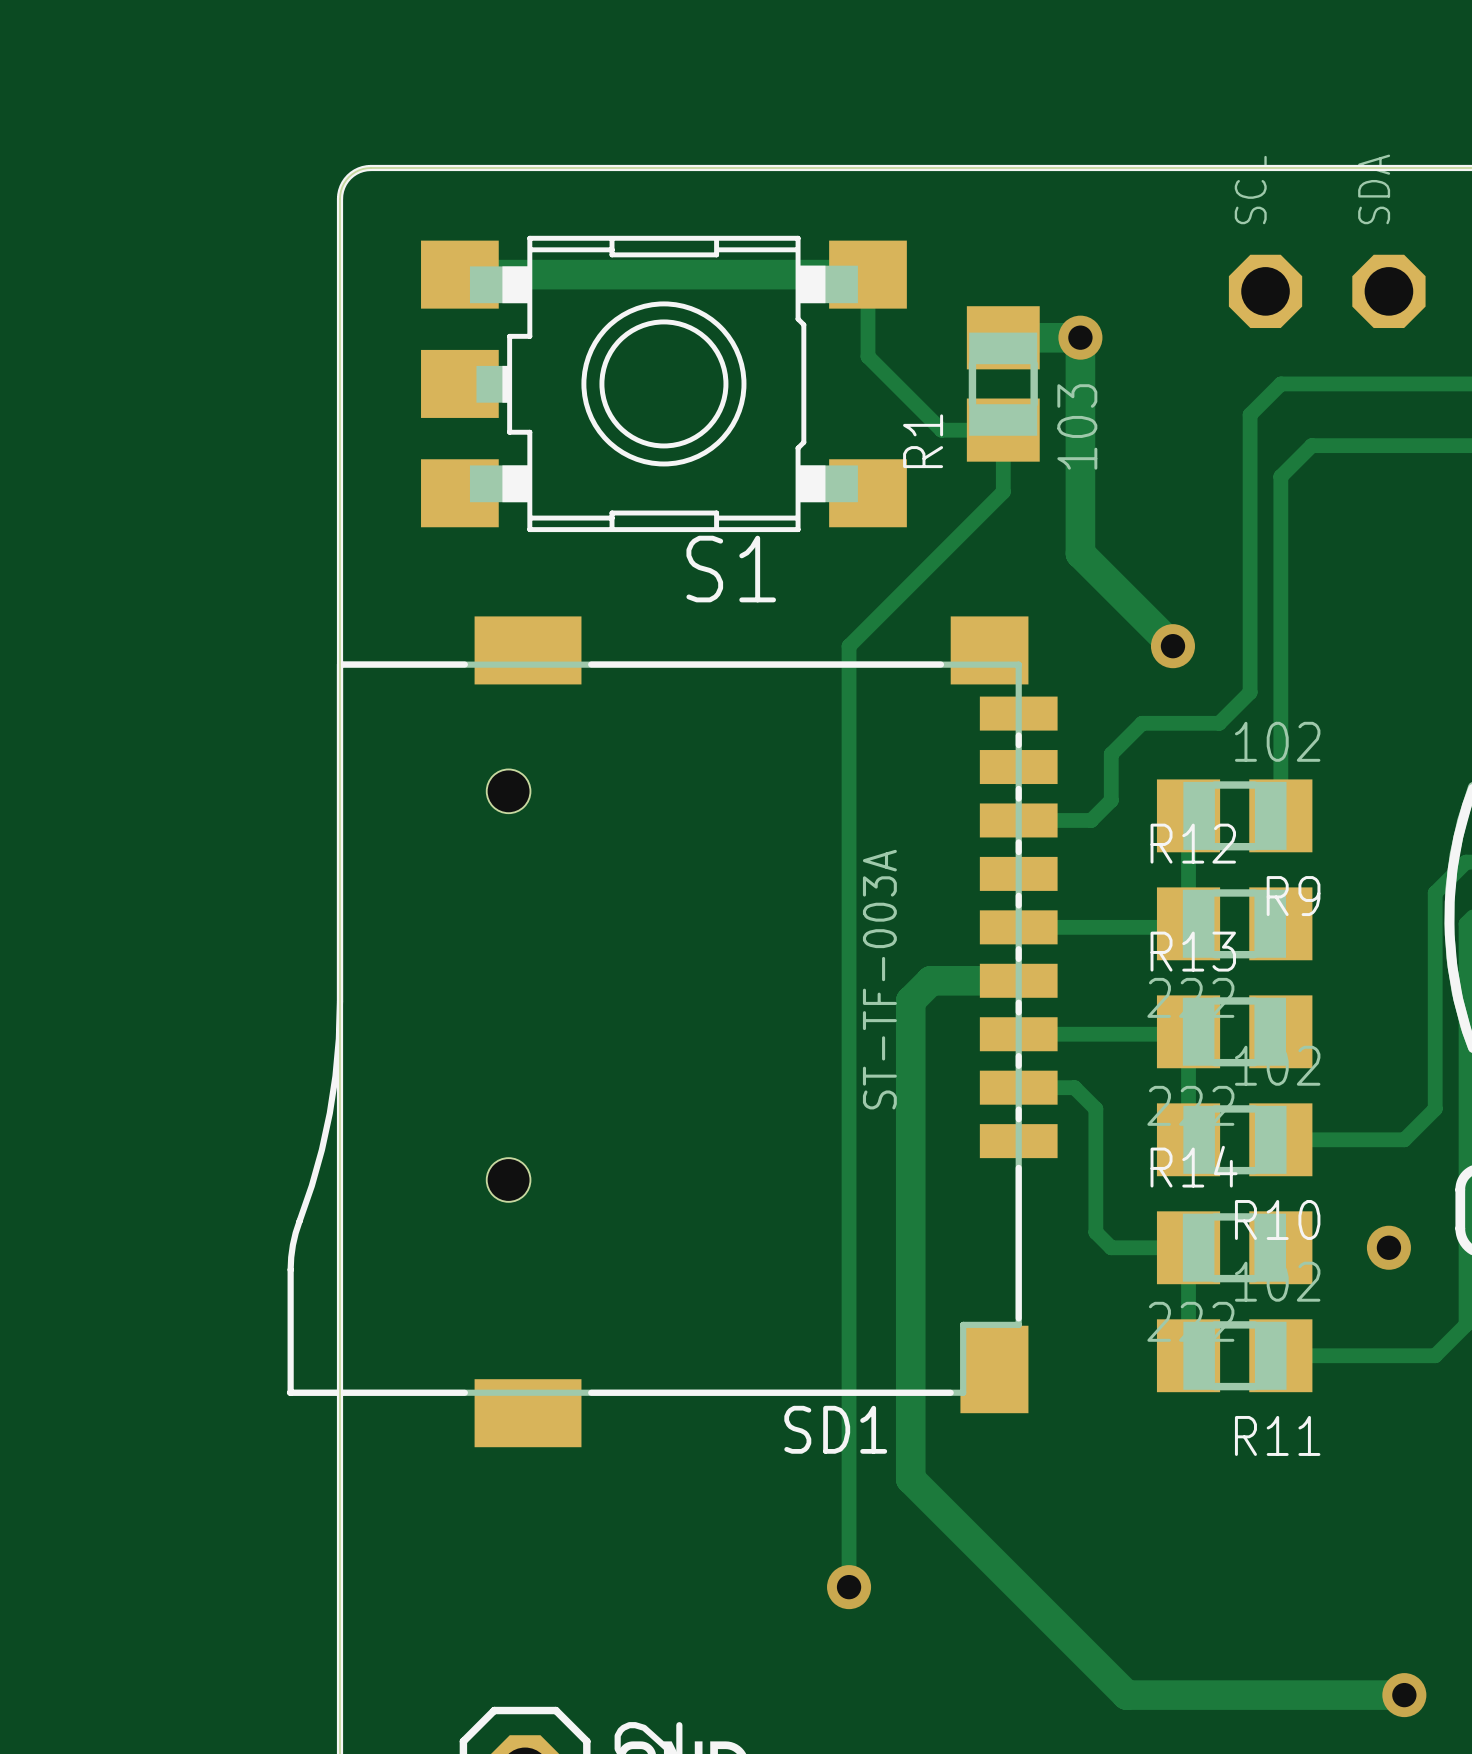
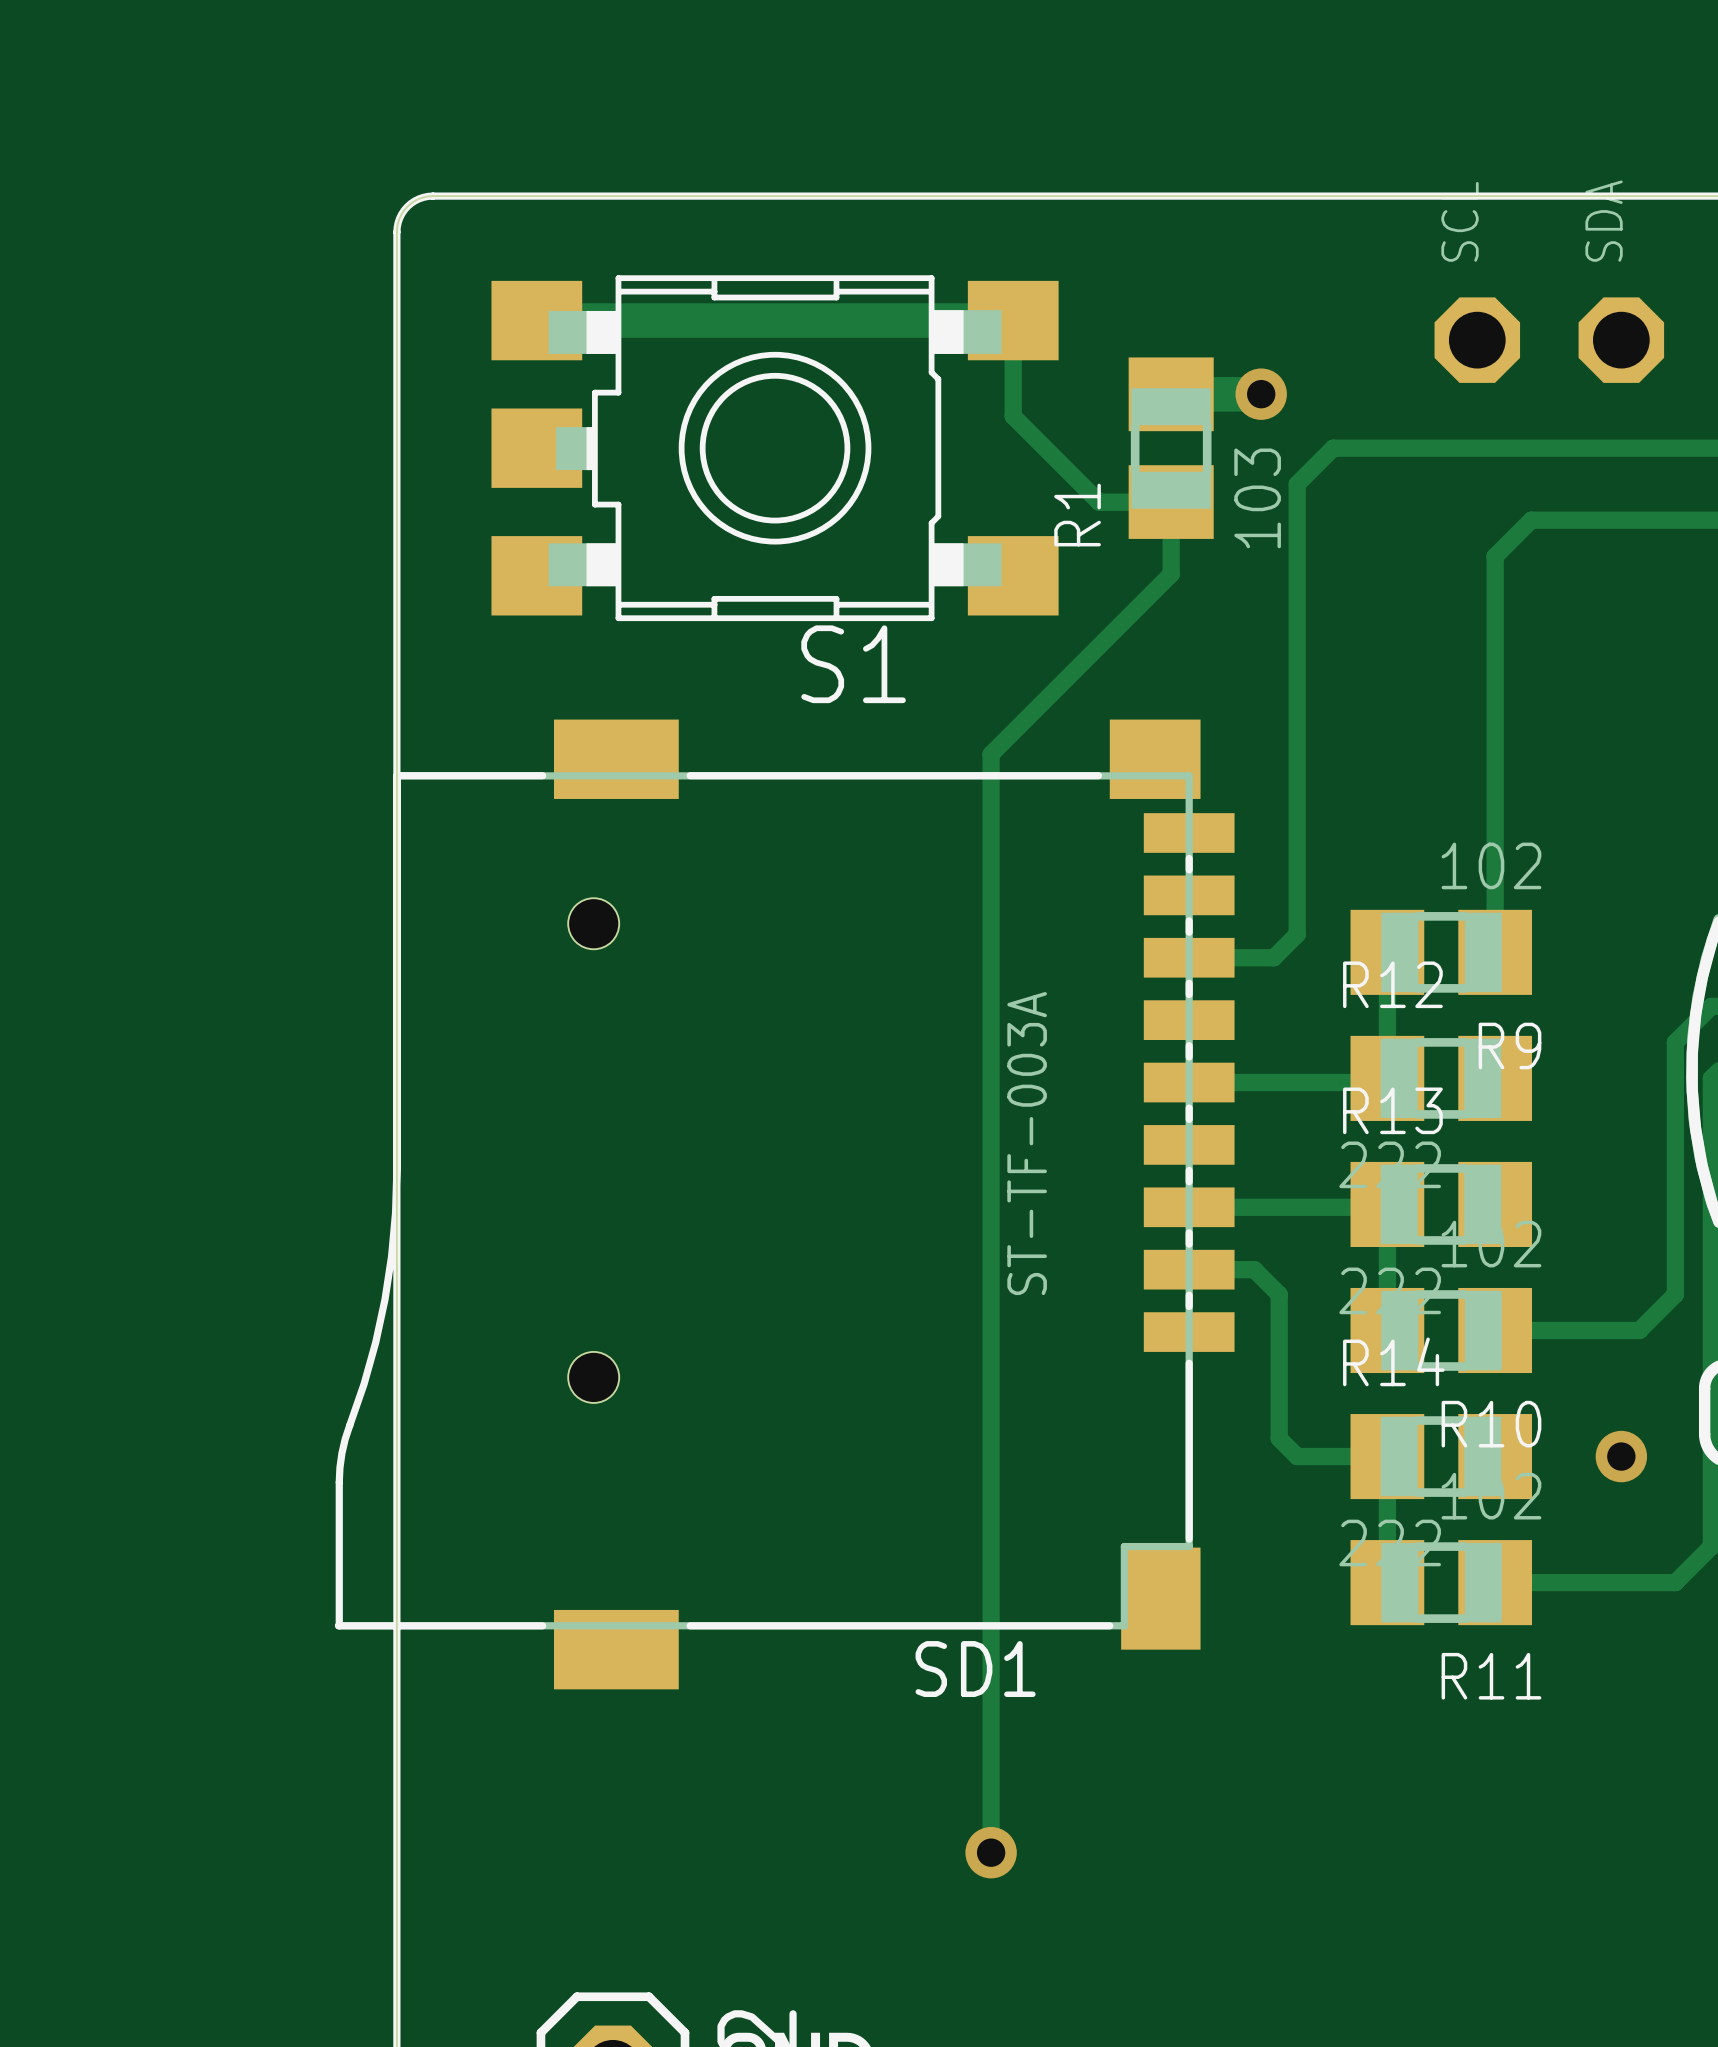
track: (1080, 337) (1080, 553) (1172, 646) -> none
track: (1280, 383) (1250, 414) (1250, 692) (1219, 723) (1142, 723) (1111, 754) -> (1495, 448) (1333, 448) (1297, 484) (1297, 880)
via: (1172, 646) -> none
track: (1018, 980) (930, 980) (910, 1000) (910, 1479) (1126, 1695) (1404, 1695) -> none
via: (1404, 1695) -> none

